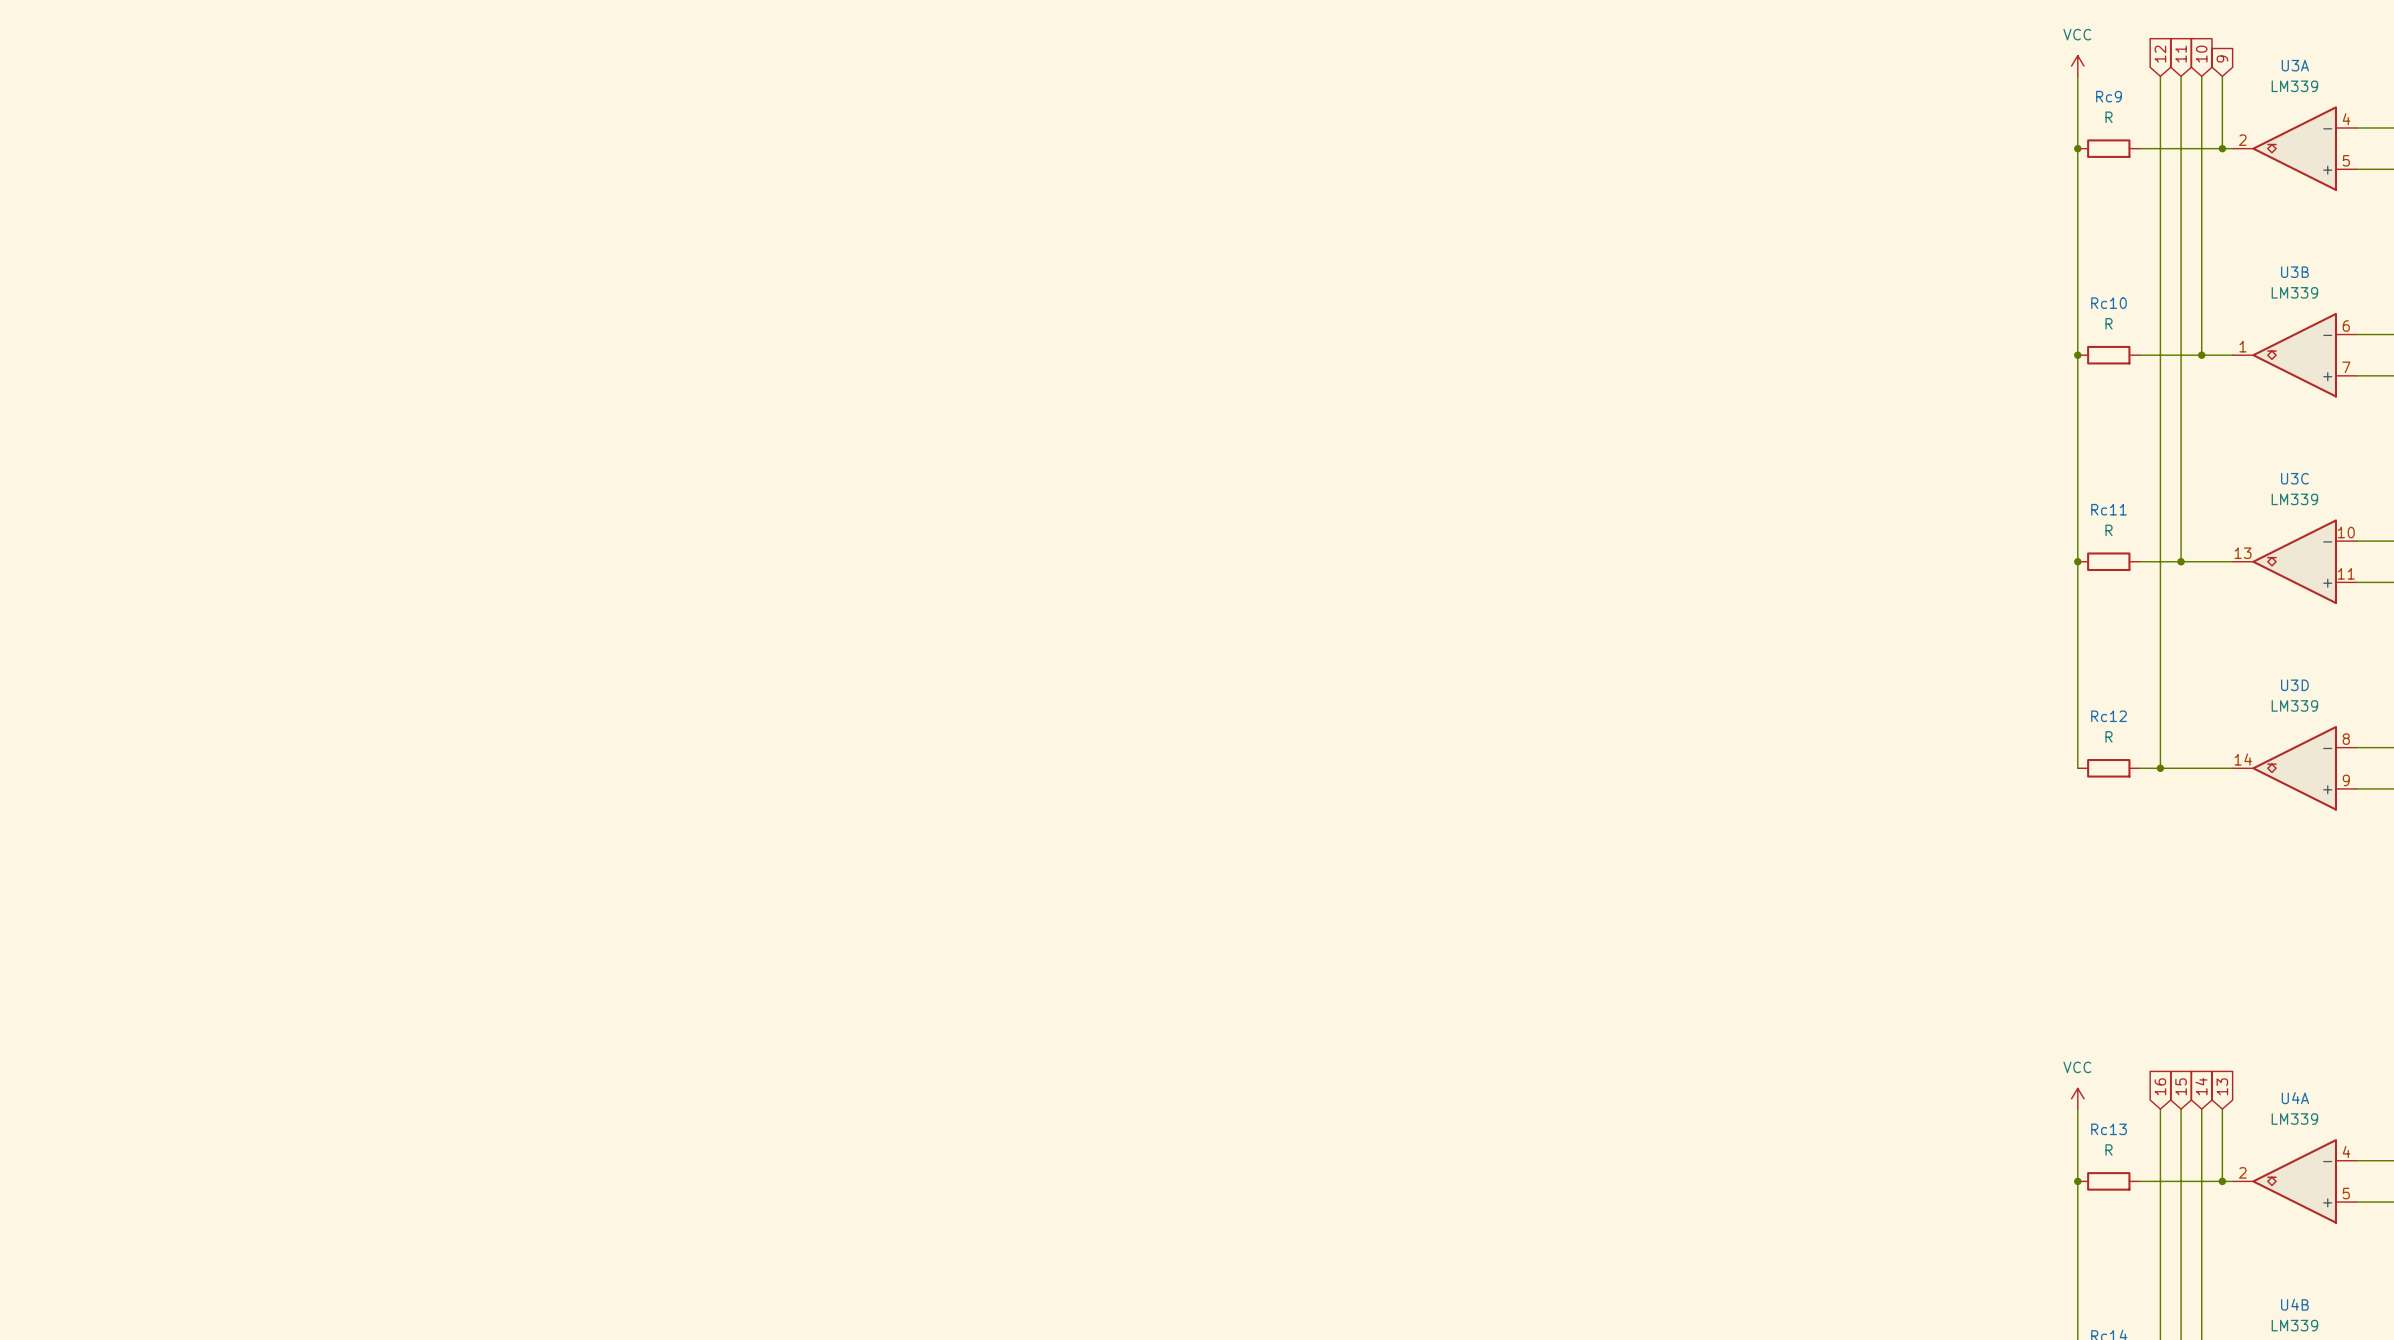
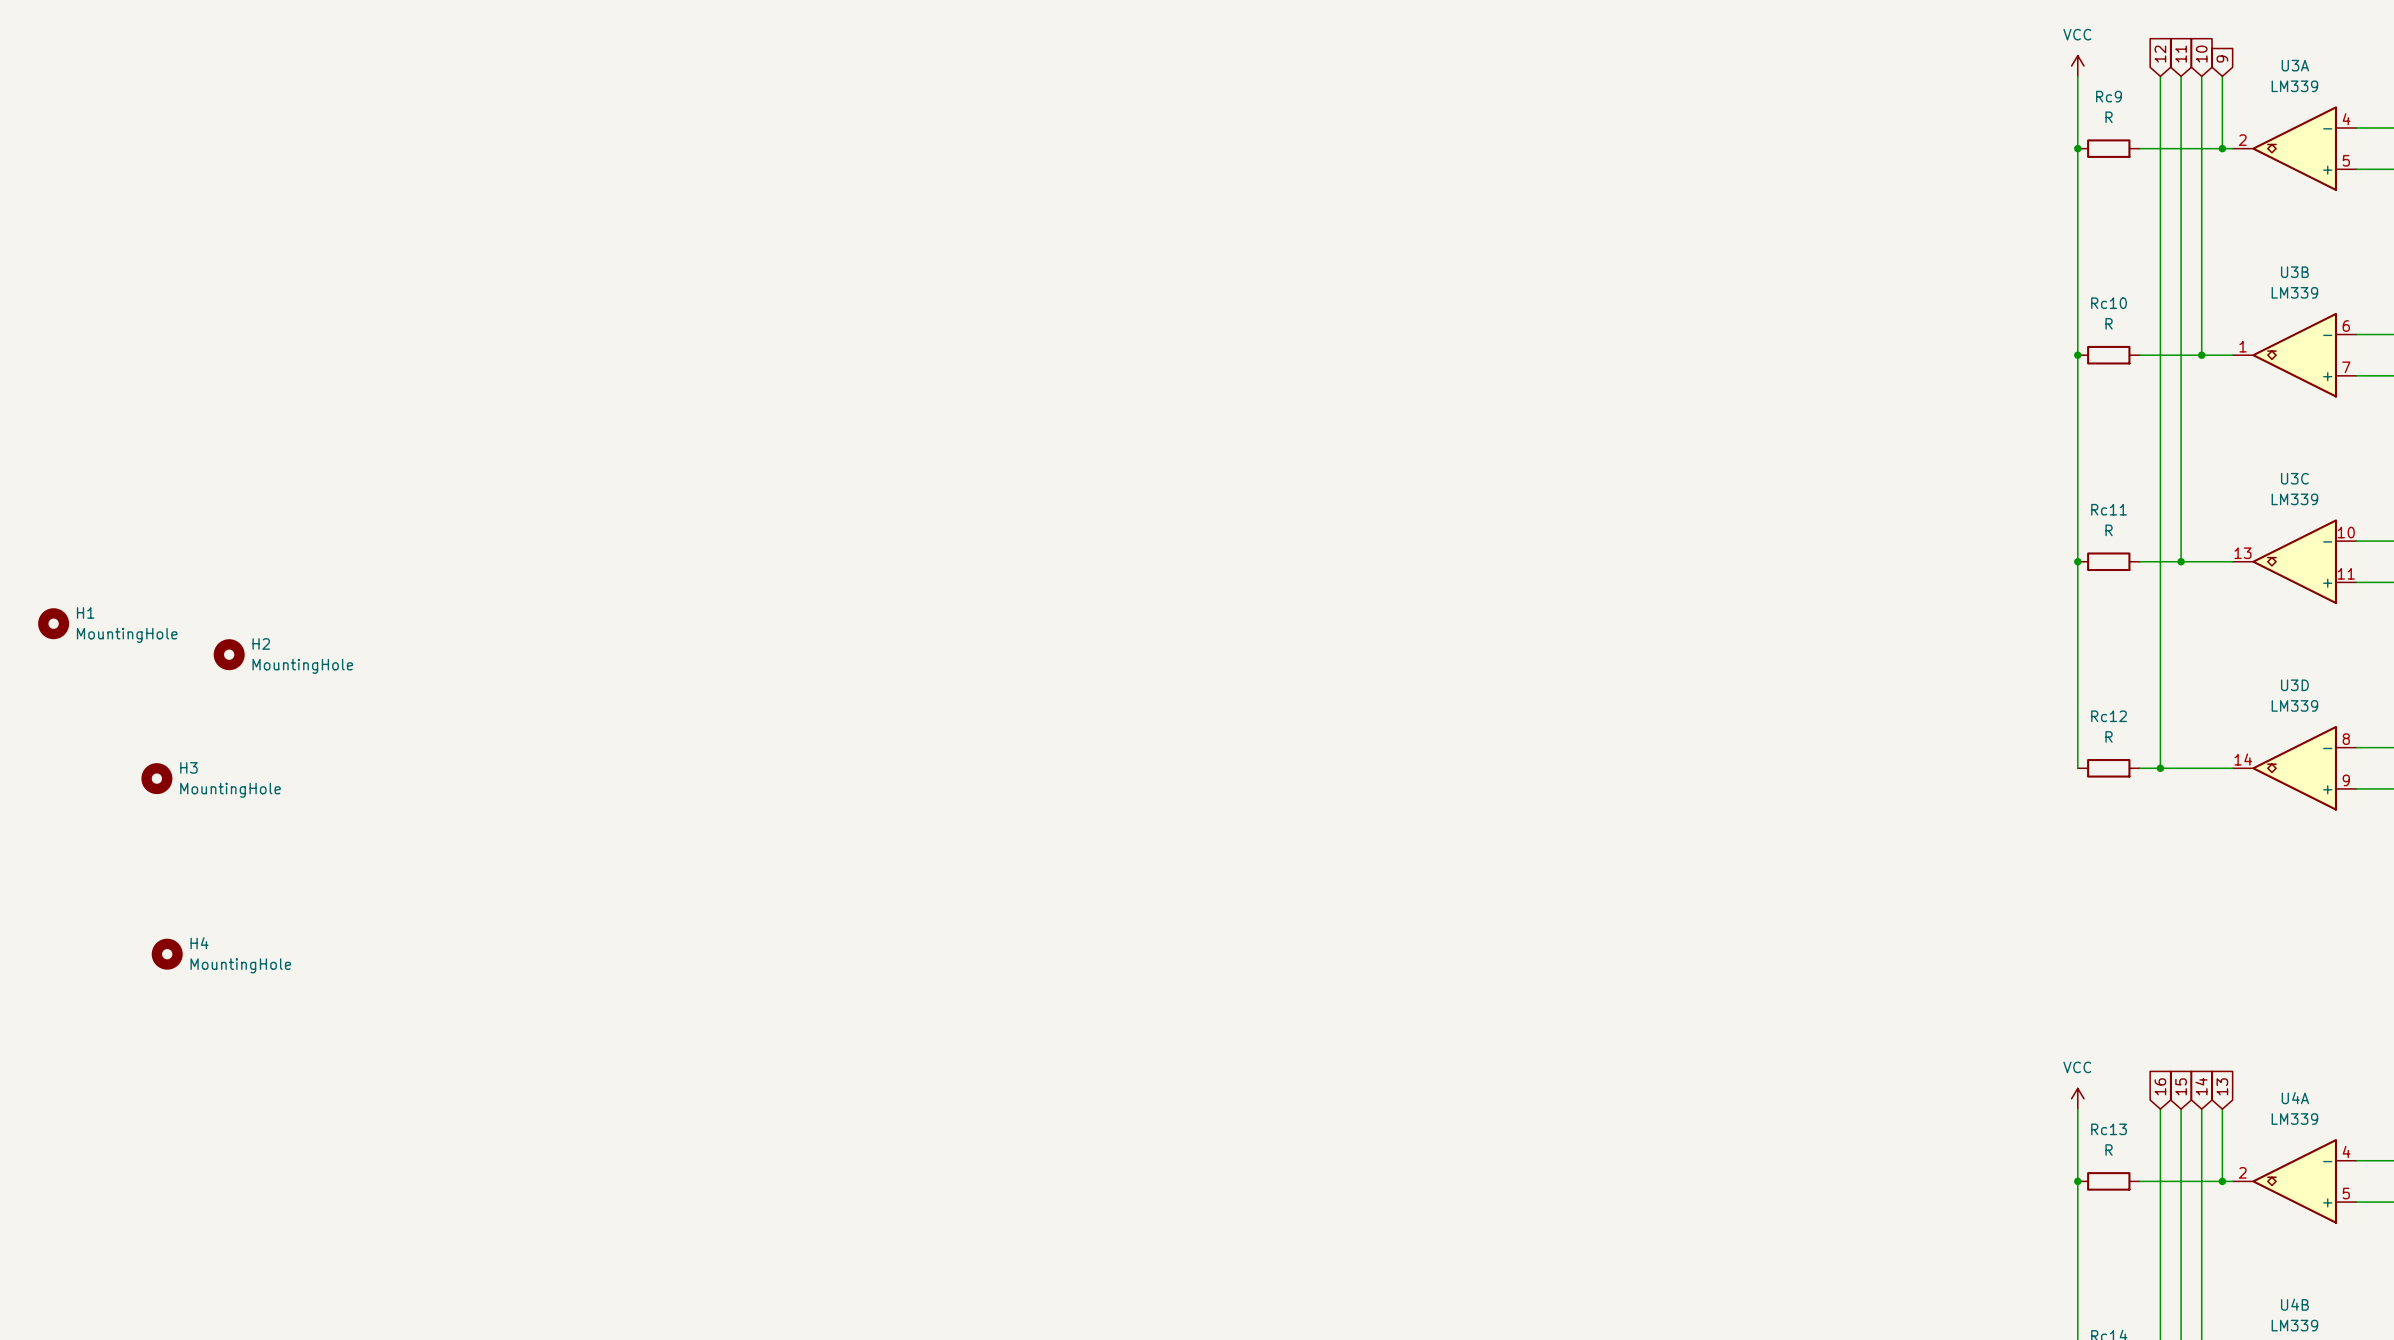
H1: none -> MountingHole (53, 623)
H2: none -> MountingHole (229, 654)
H3: none -> MountingHole (156, 778)
H4: none -> MountingHole (167, 954)

